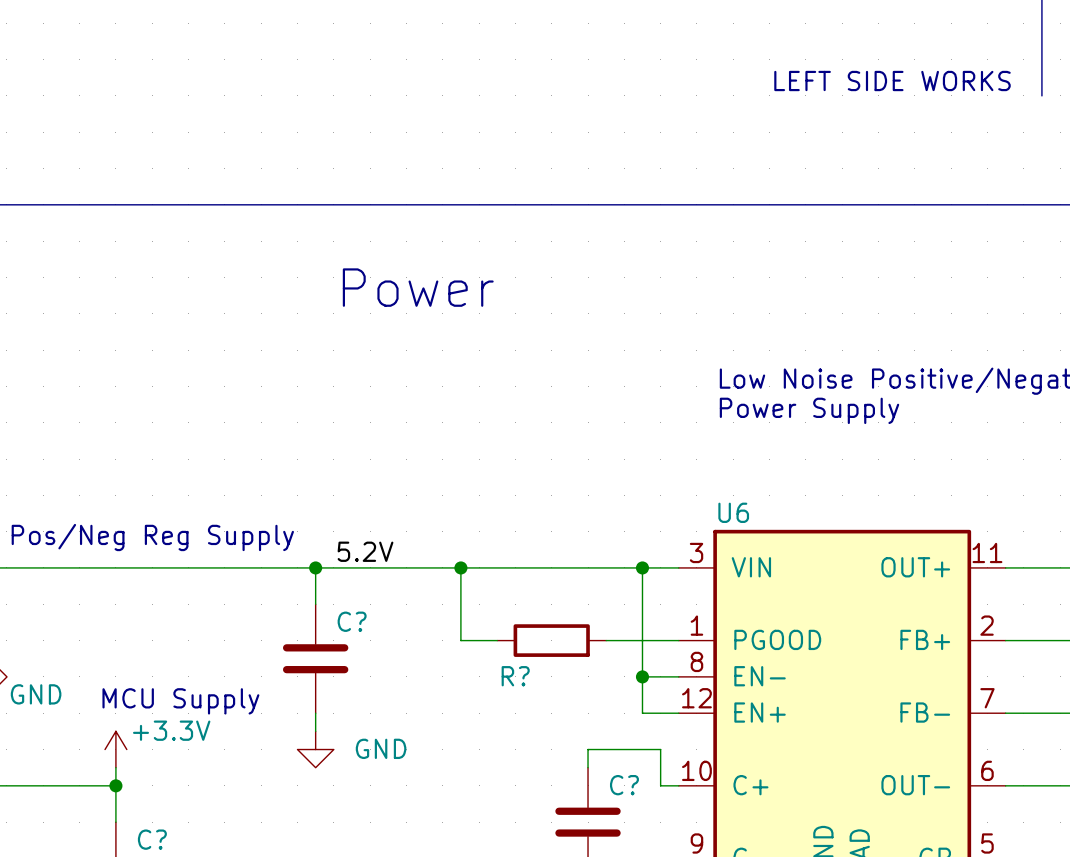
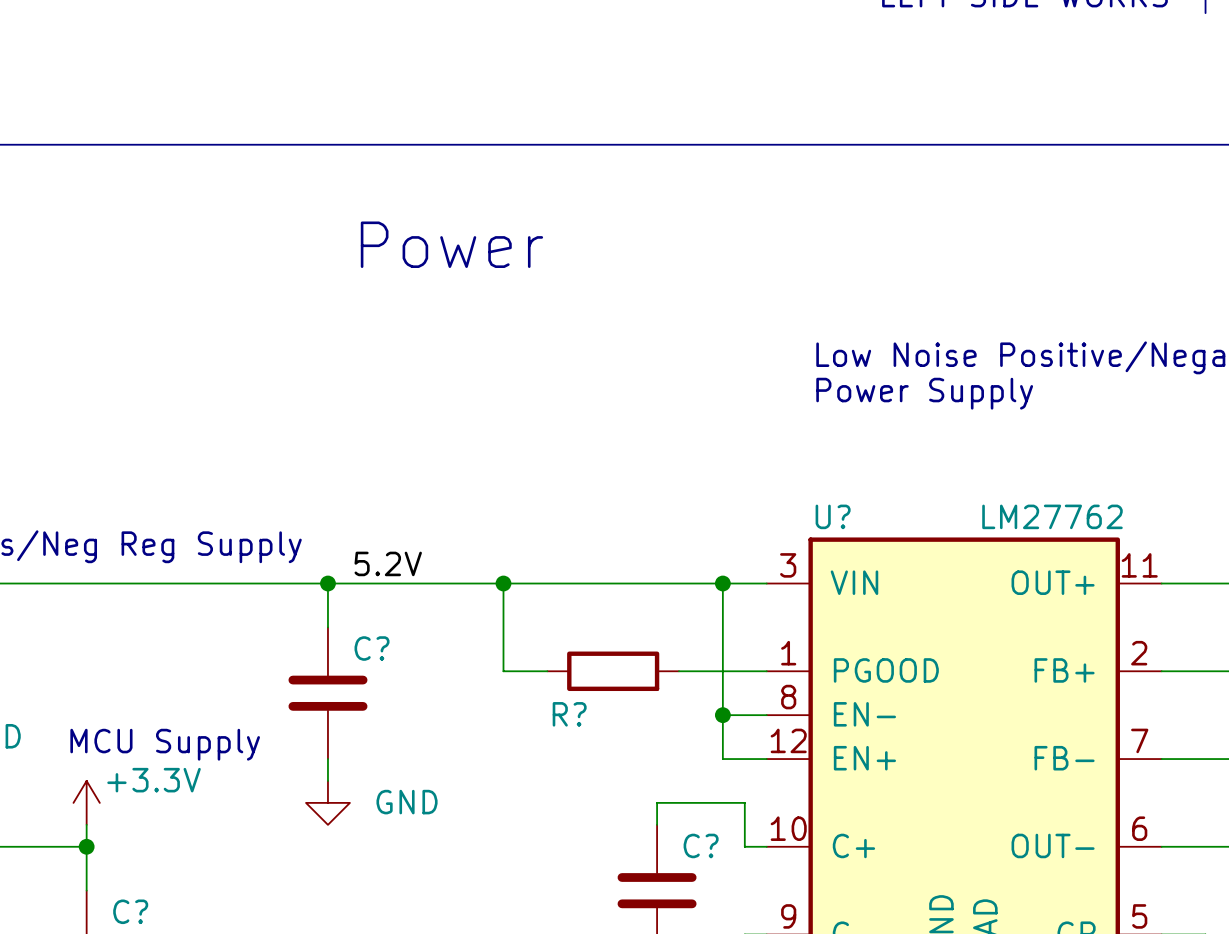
U6 name: U6 (733, 512) -> U? (833, 516)
U6 value: none -> LM27762 (1052, 516)

